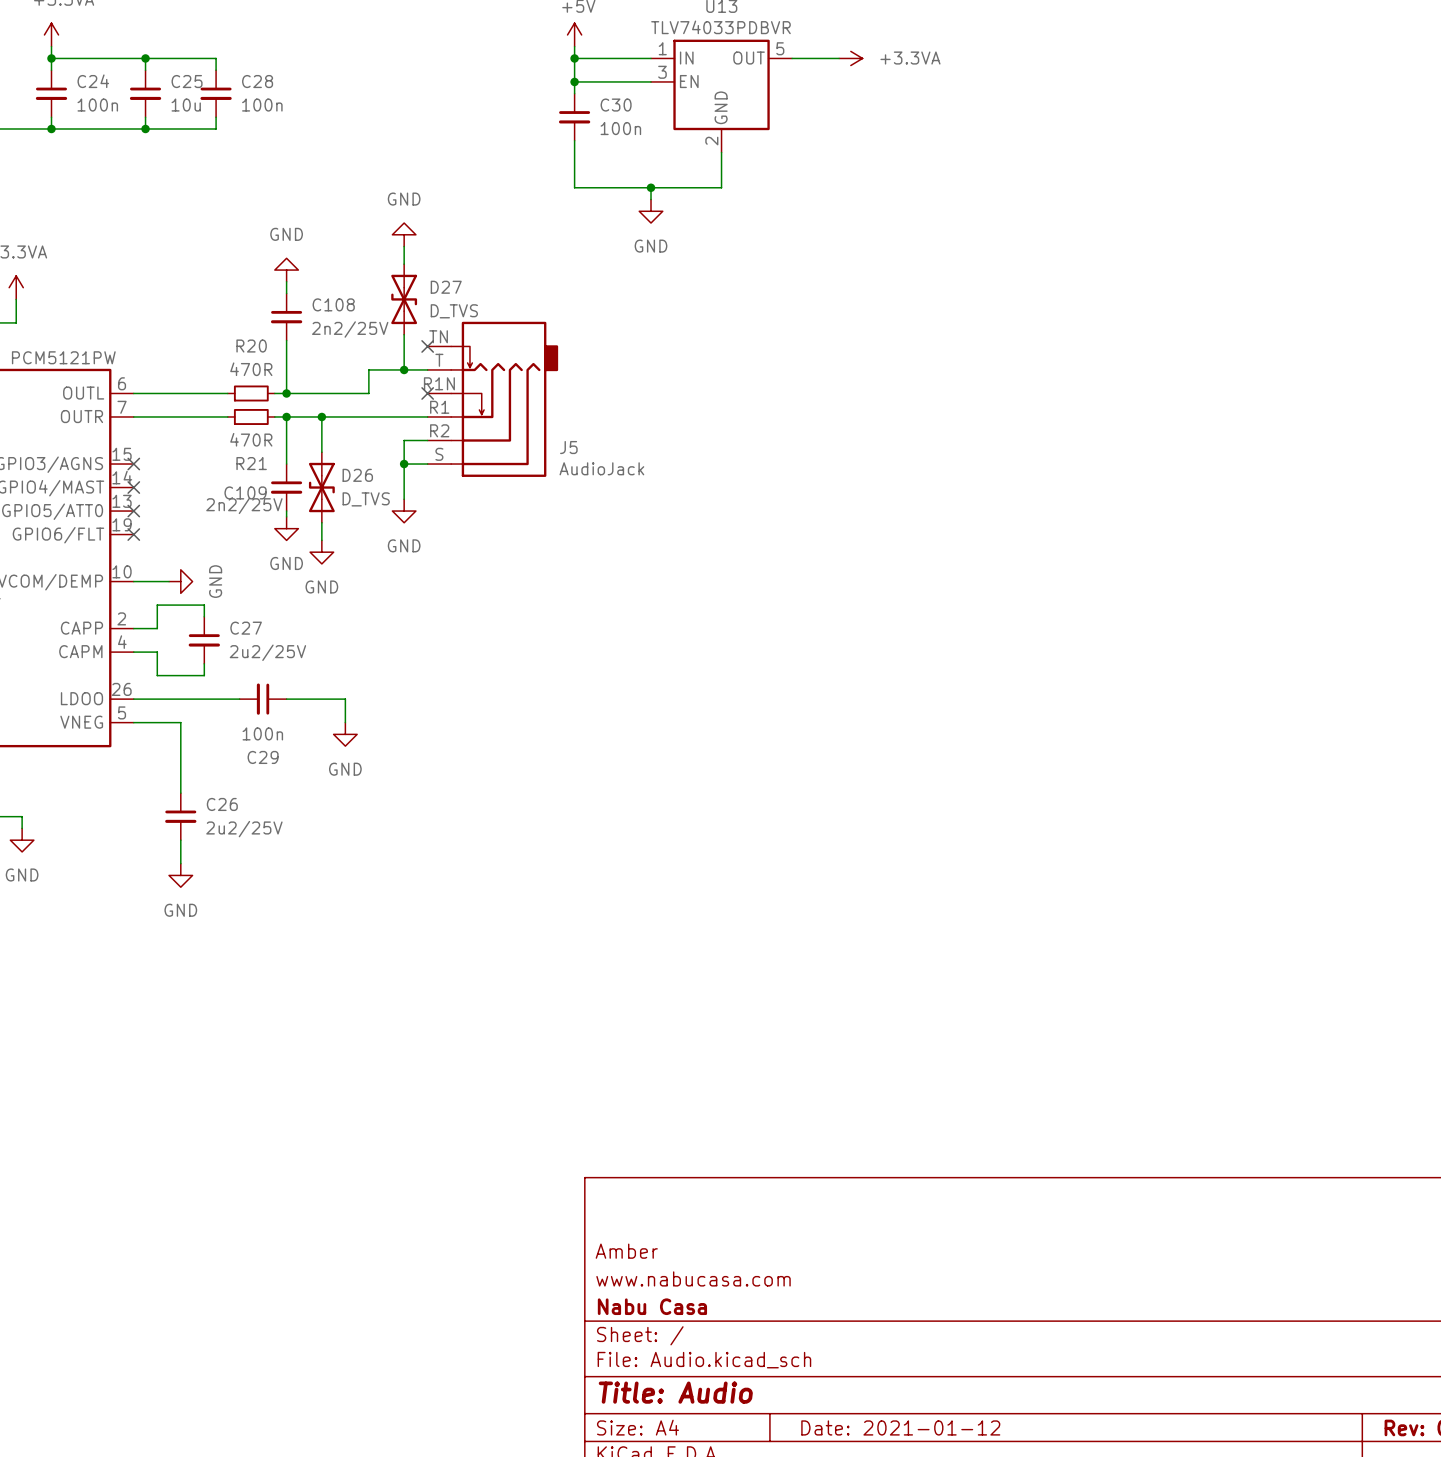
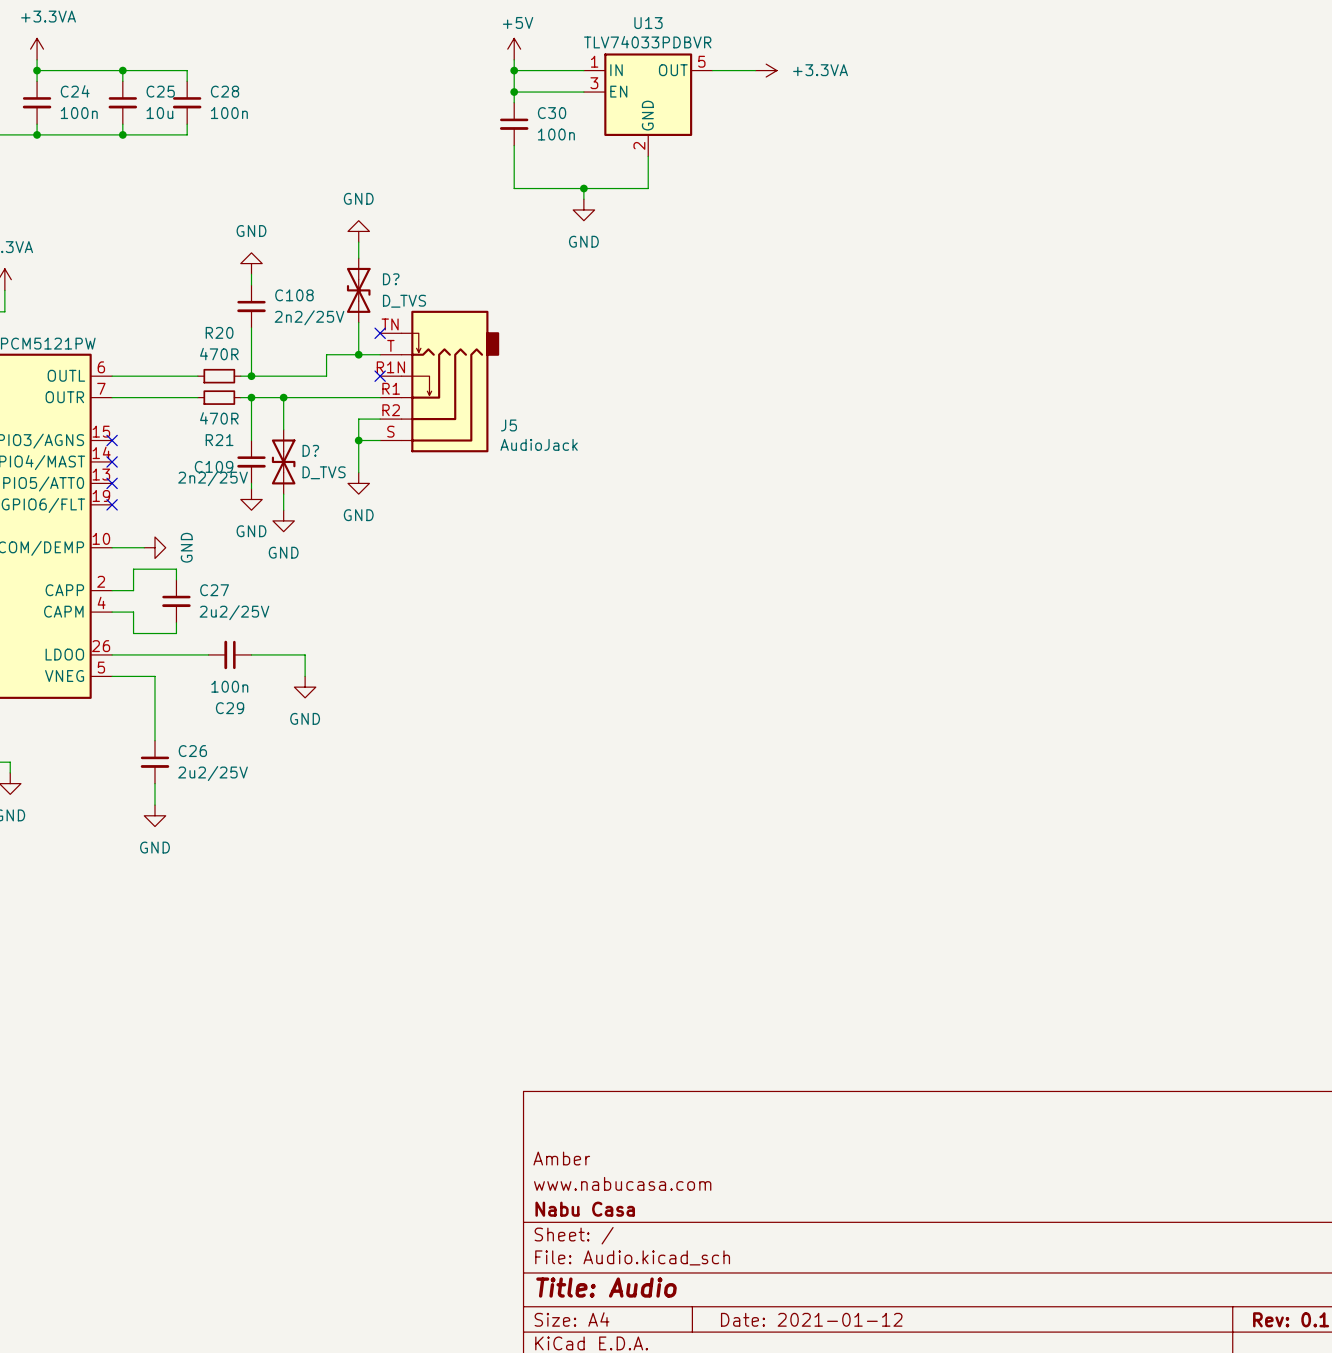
D27 name: D27 (446, 287) -> D? (391, 279)
D26 name: D26 (357, 475) -> D? (310, 450)

